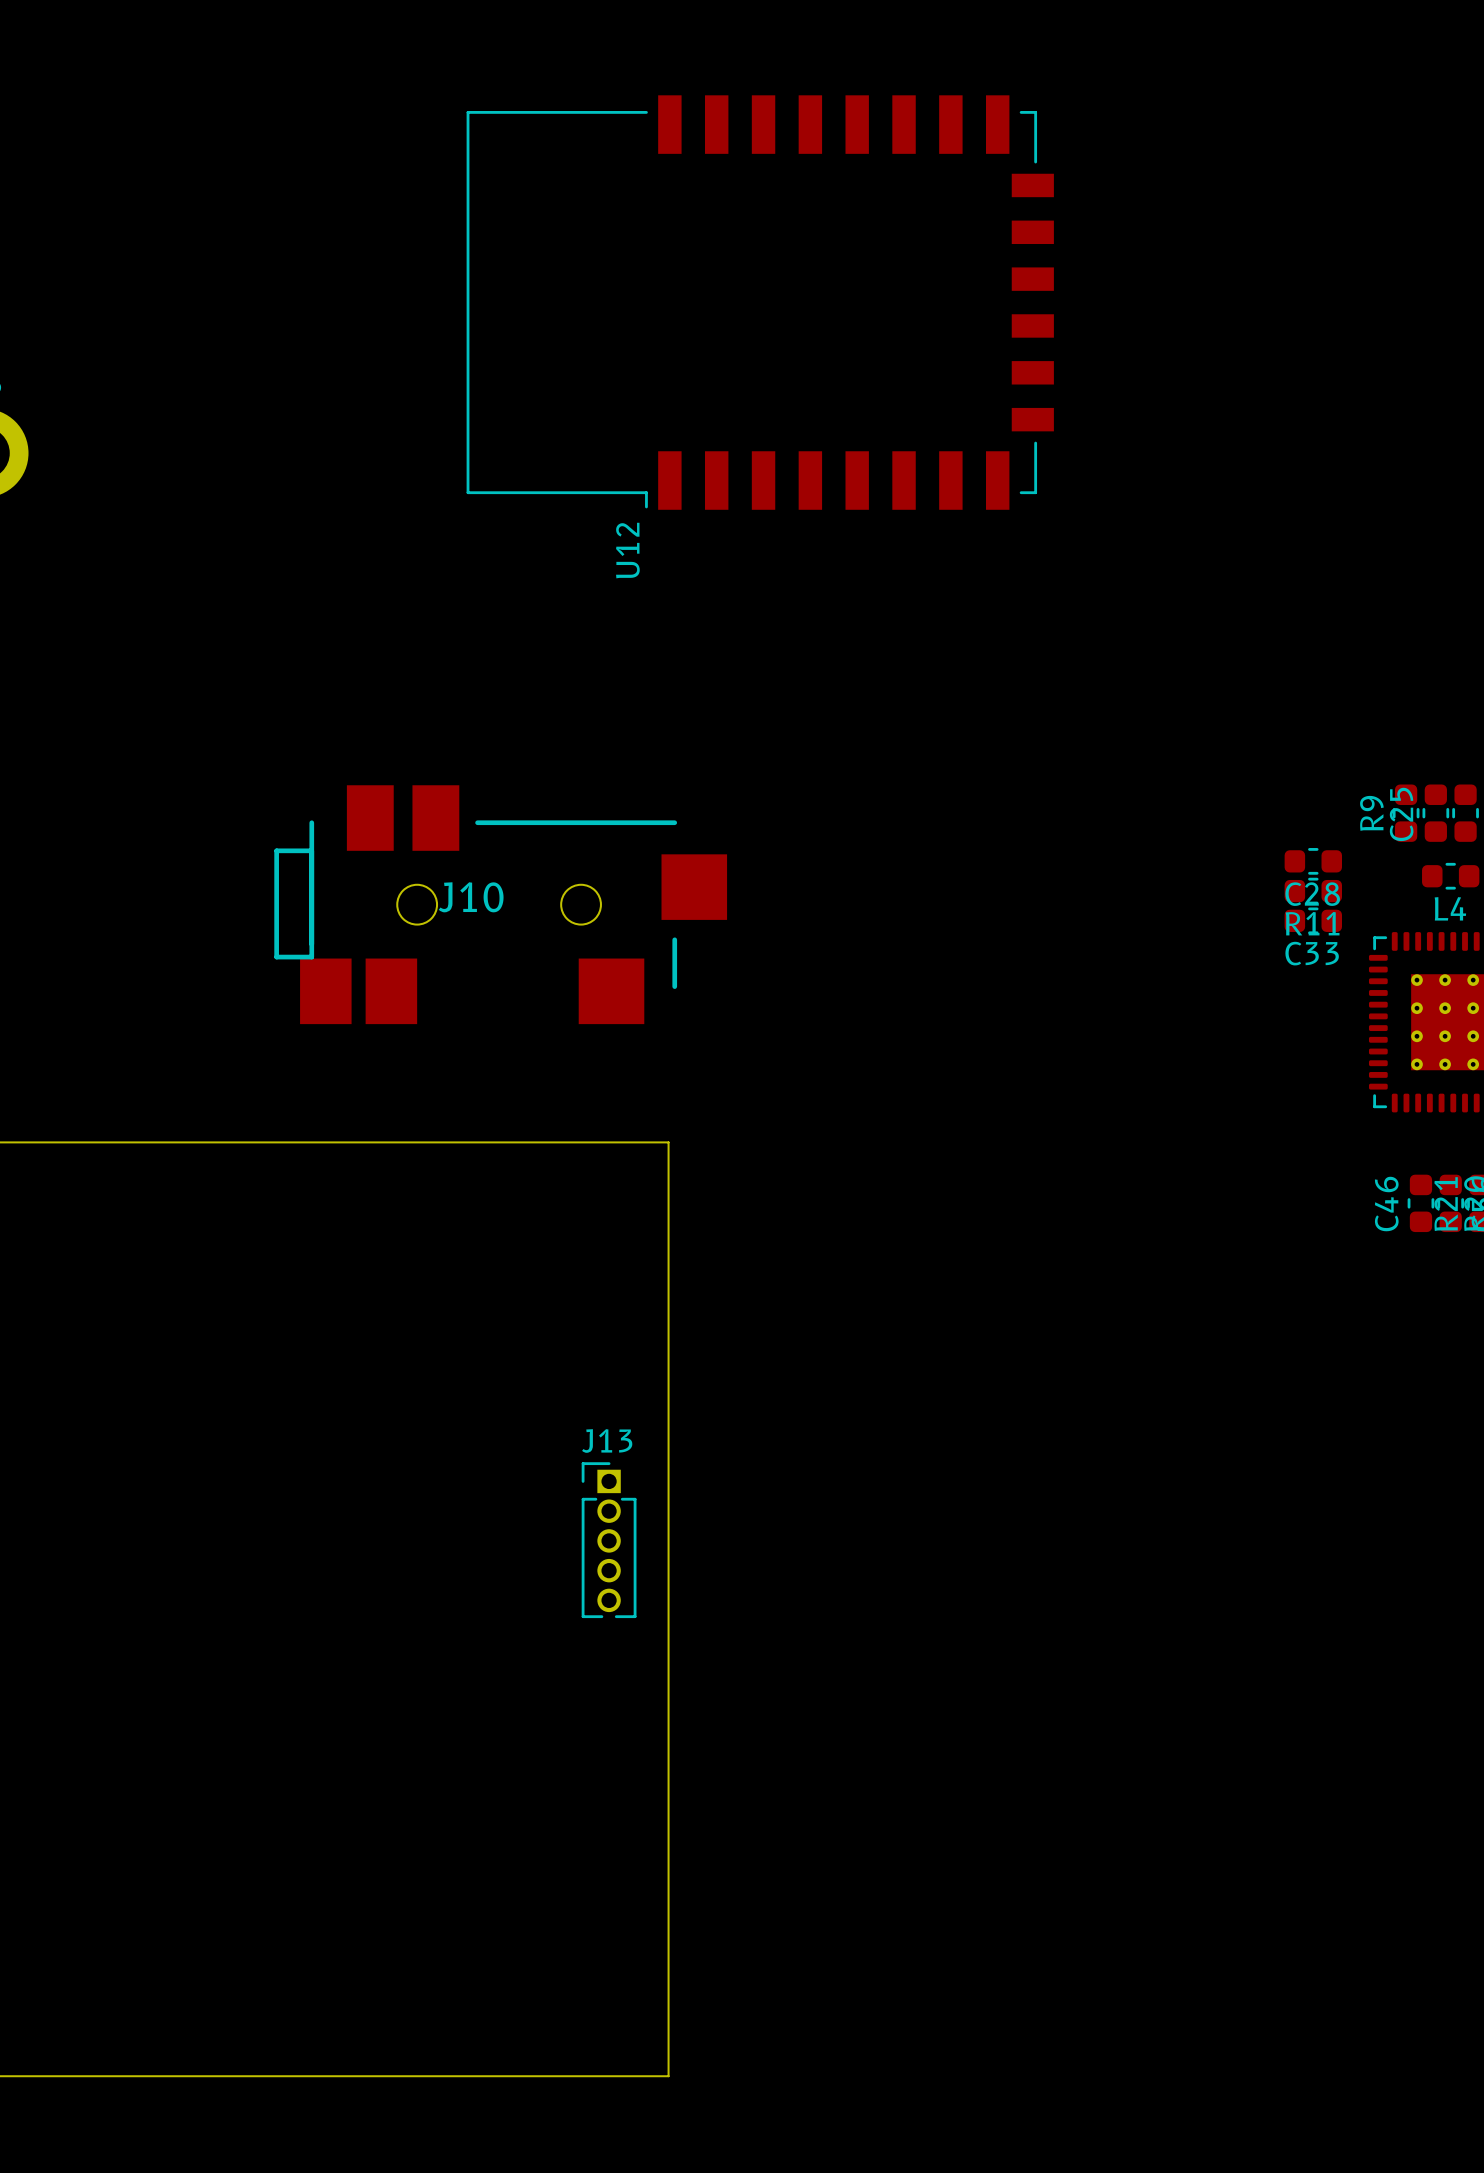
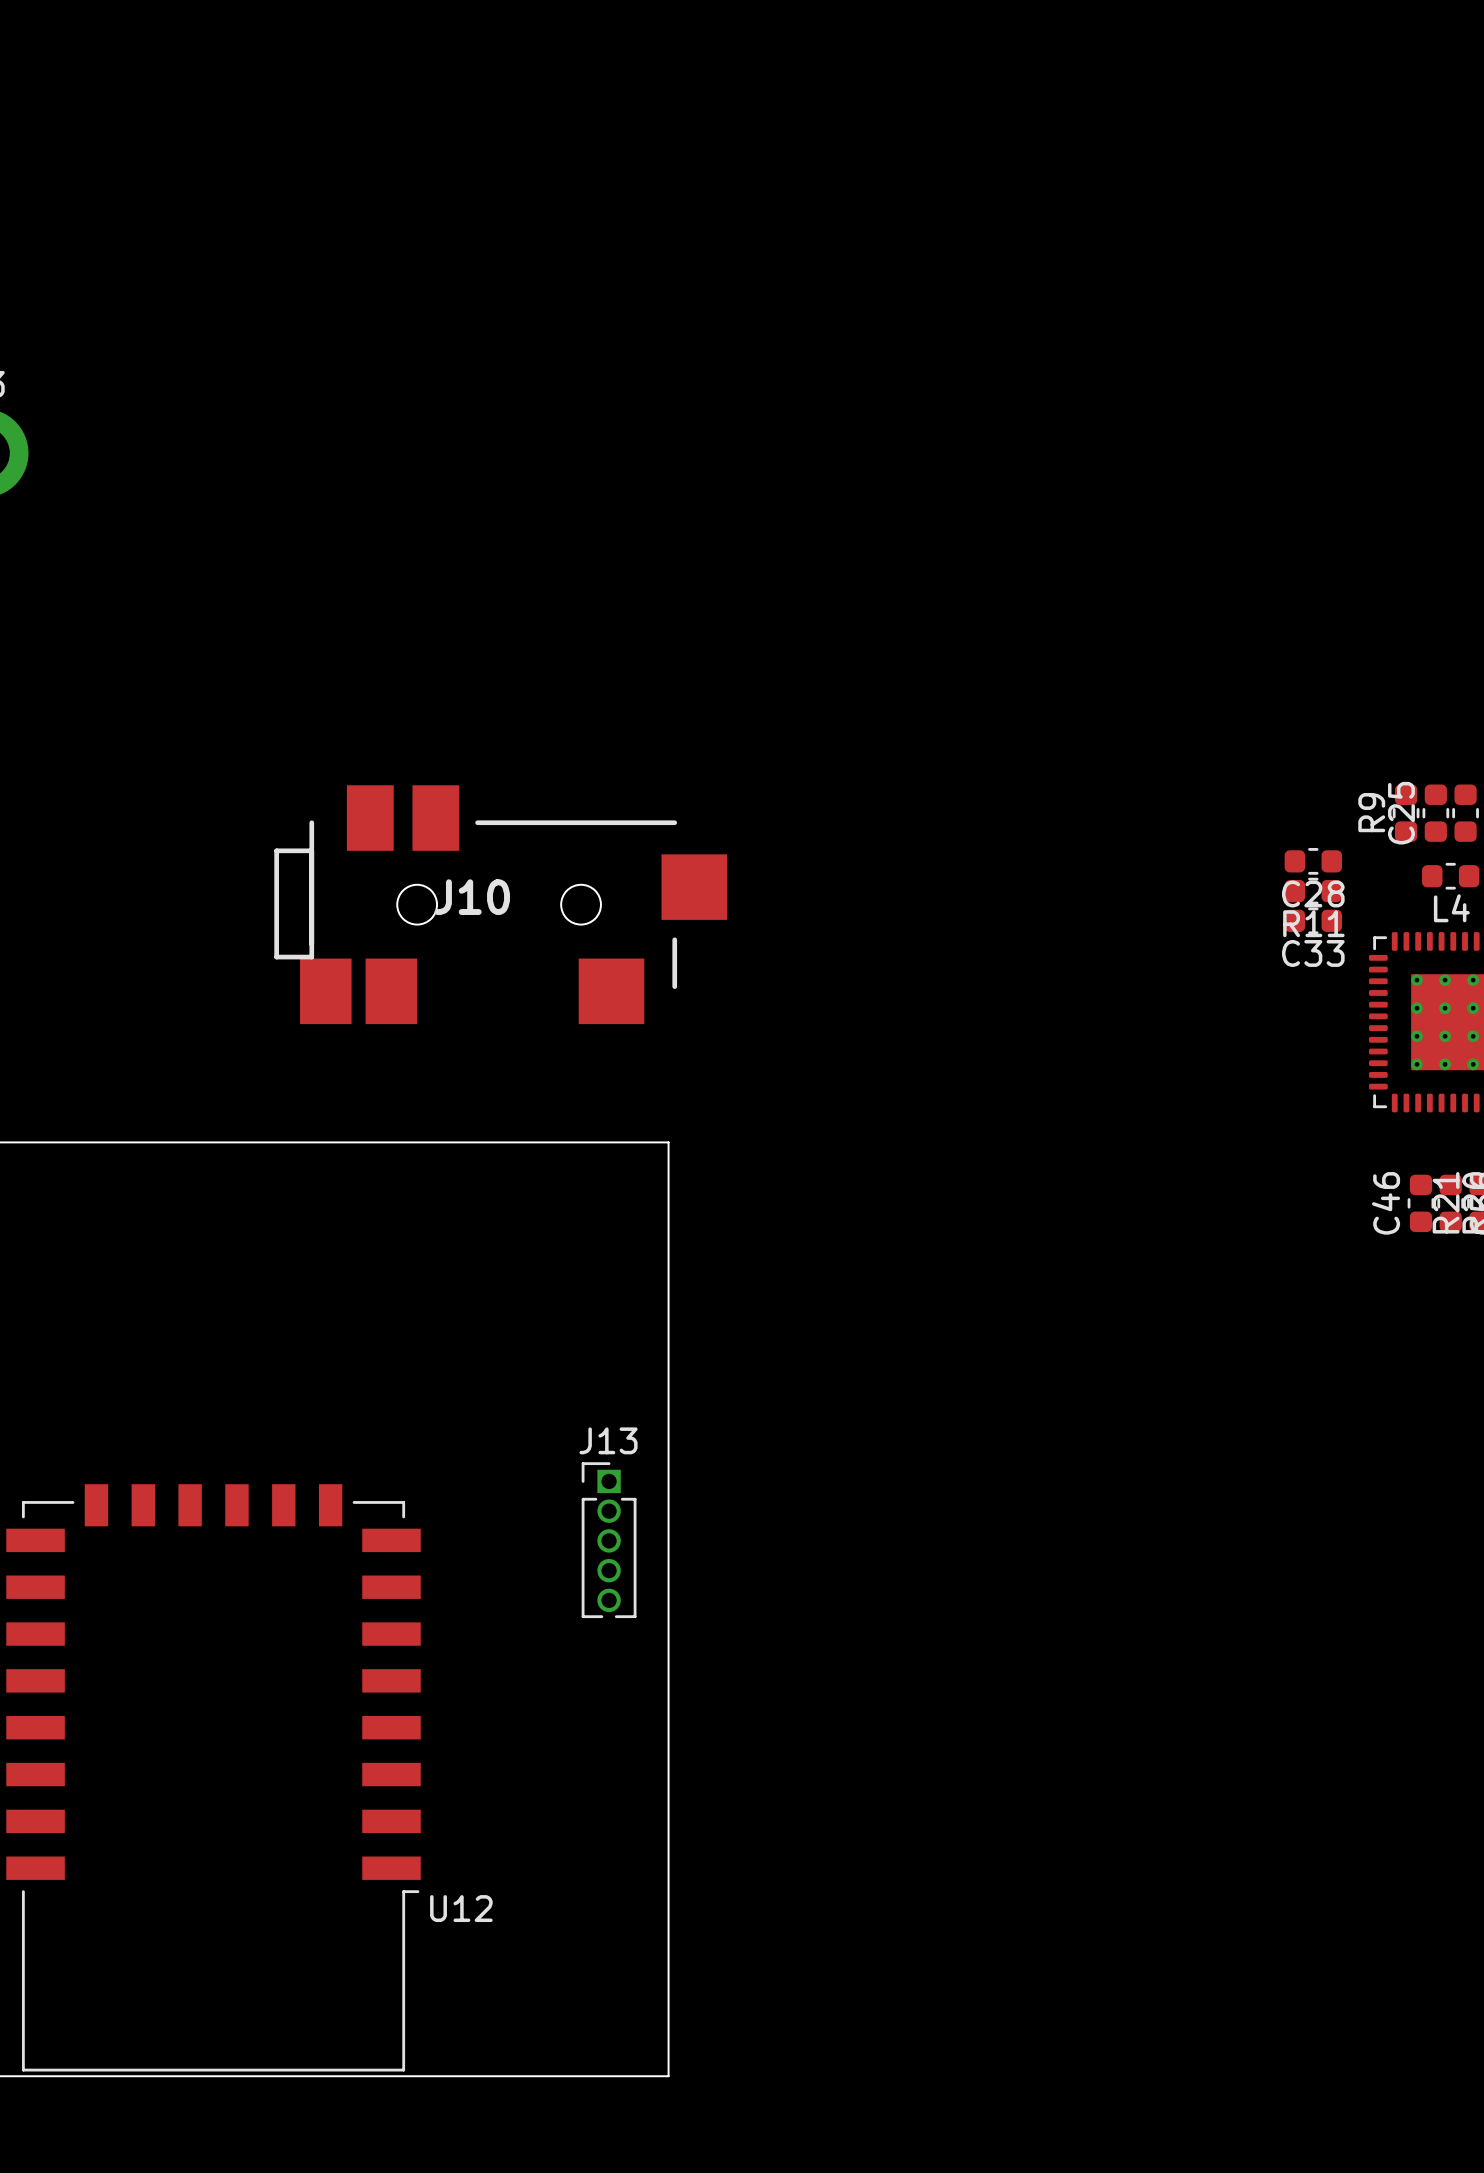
U12 rotation: 0° (760, 302) -> 90° counterclockwise (213, 1777)
U12 position: (760, 302) -> (213, 1777)

